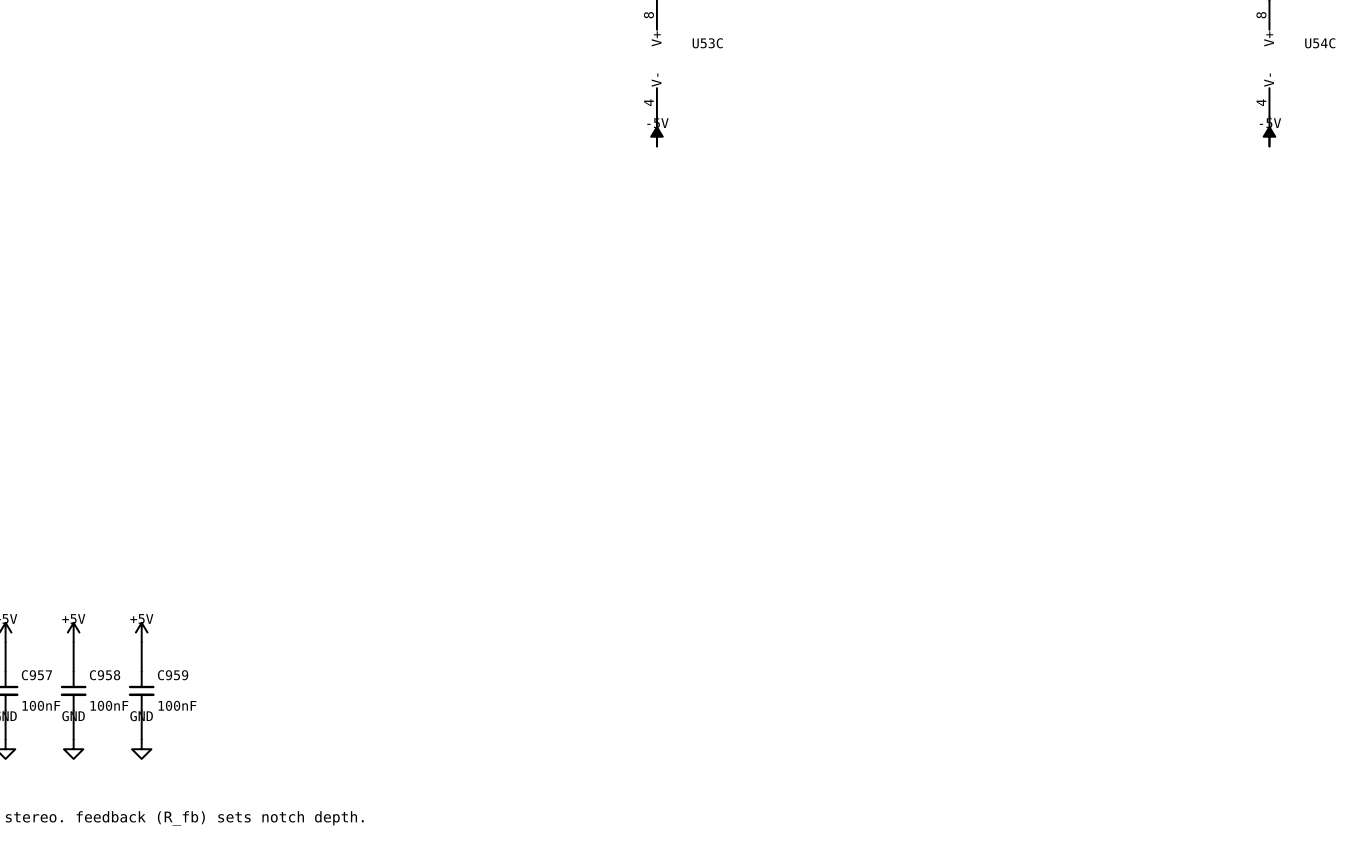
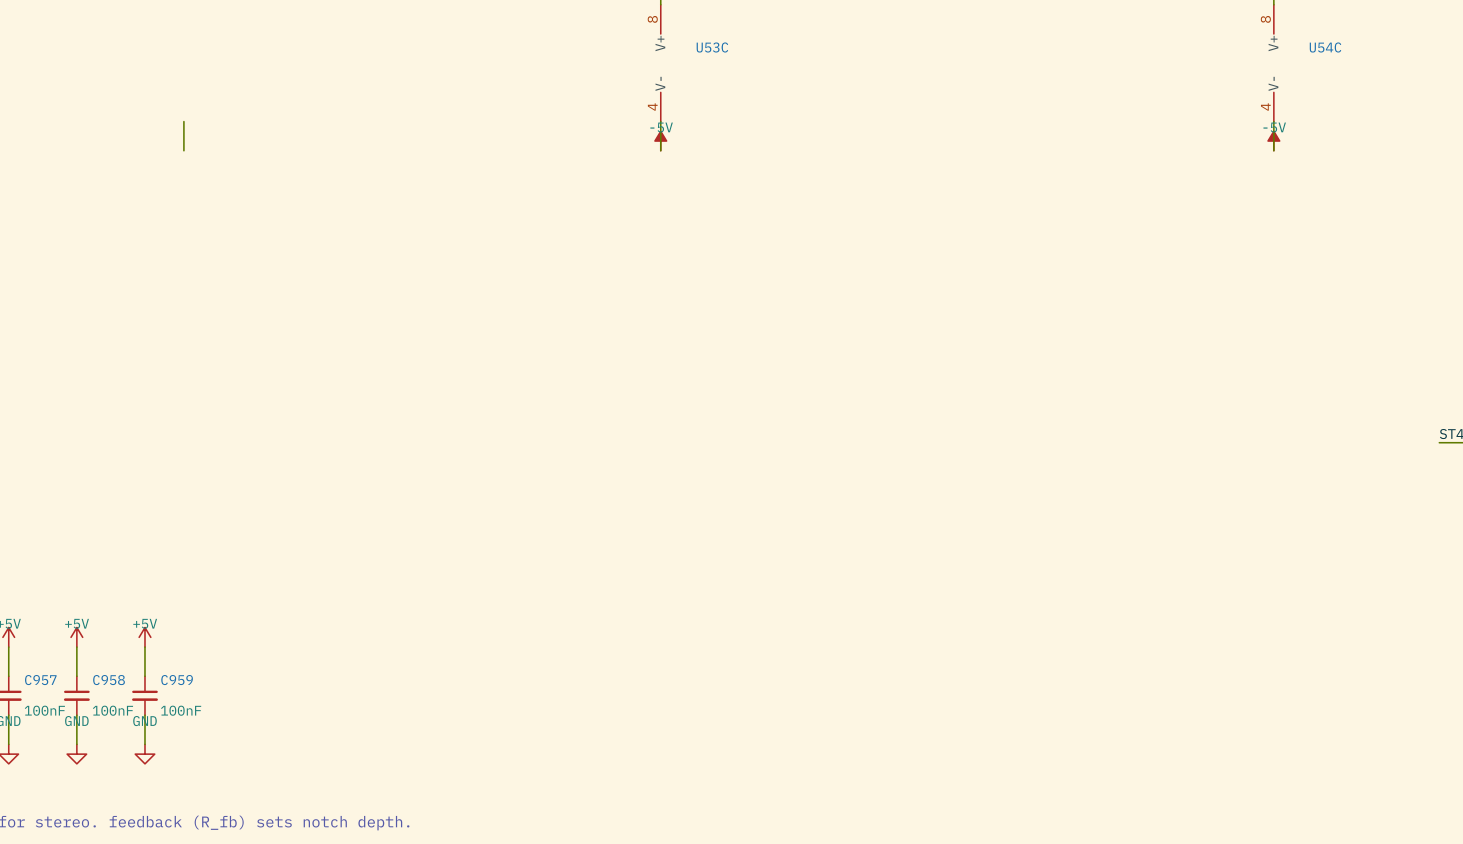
wire: none -> (183, 121) (183, 150)

